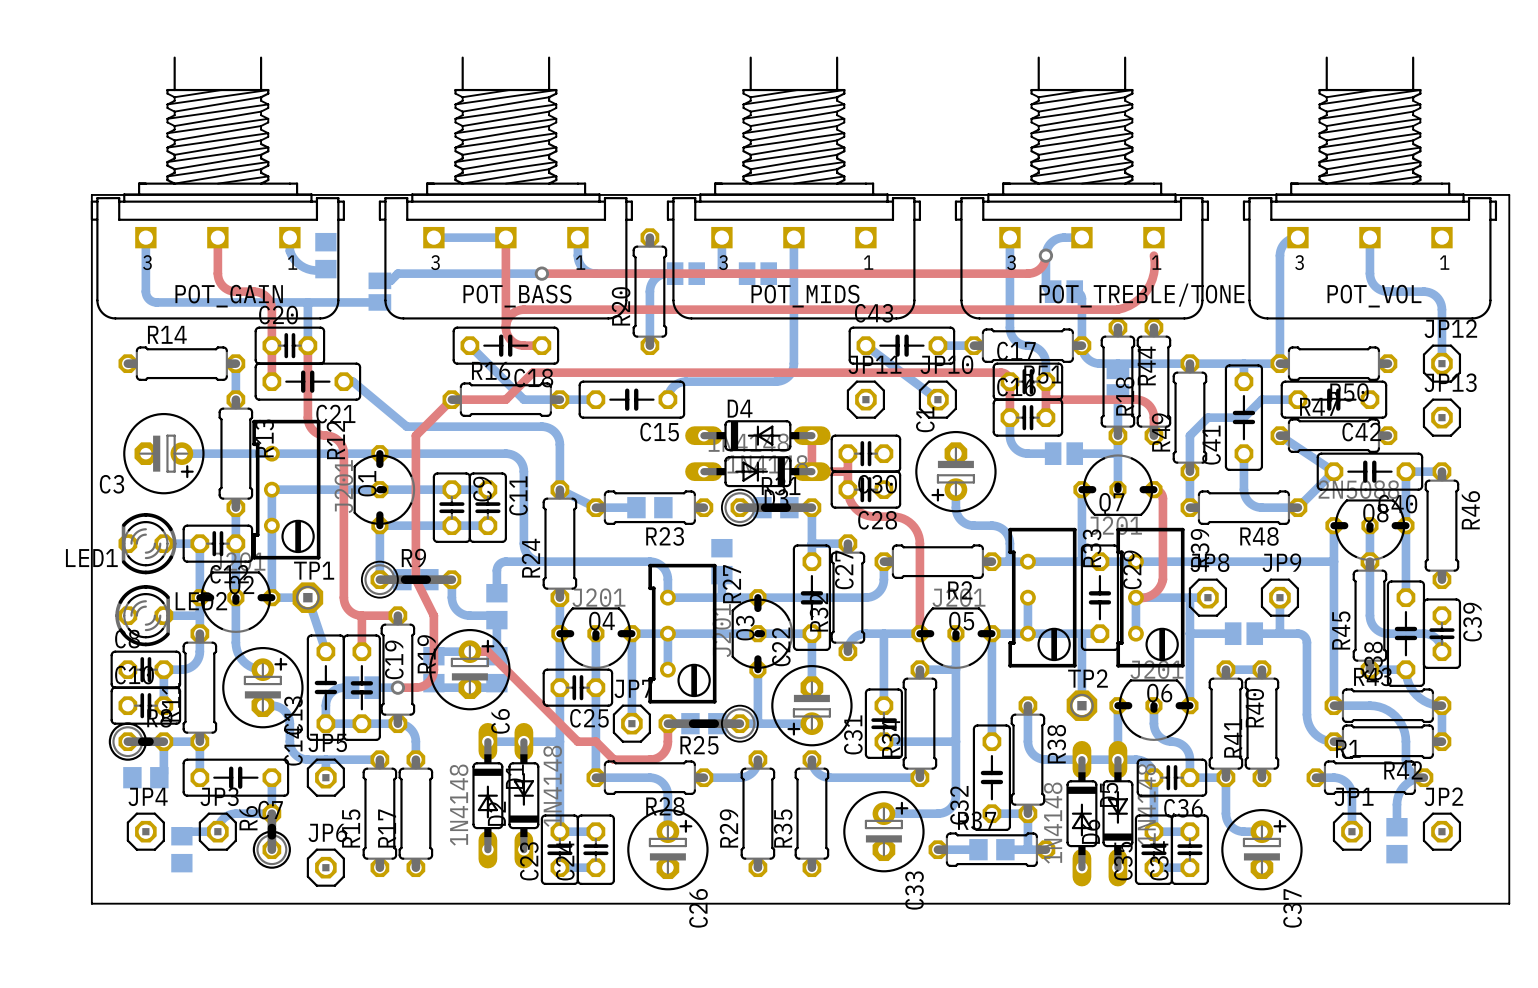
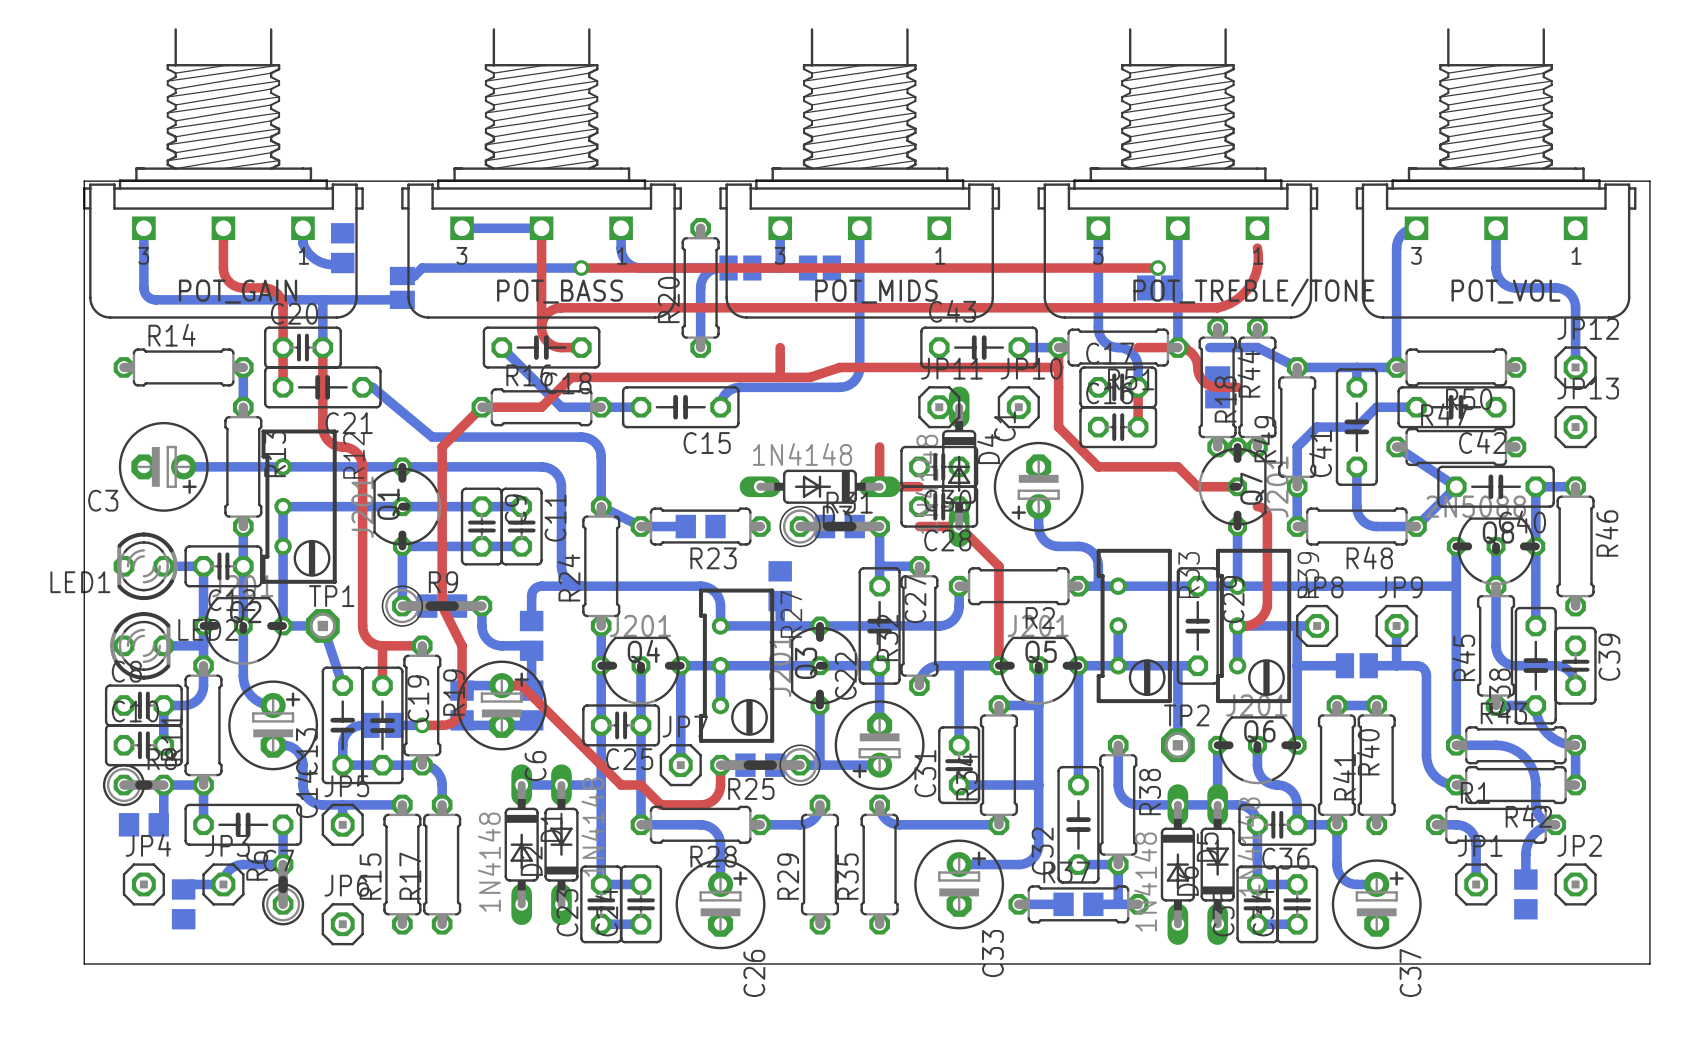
bottom track: (1081, 237) (1059, 238) (1048, 246) (1045, 255) (1045, 285) (1048, 289) (1053, 291) -> (1177, 228) (1177, 295)
top track: (1045, 255) (1040, 268) (1027, 273) -> (1158, 268) (1118, 268)
via position: (1045, 255) -> (1158, 268)
bottom track: (1081, 338) (1084, 354) (1095, 363) (1189, 363) -> (1209, 347) (1257, 347) (1297, 367)
top track: none -> (780, 347) (780, 377)
bottom track: (865, 345) (937, 399) -> none
top track: none -> (1058, 347) (1058, 427) (1098, 466) (1177, 466) (1197, 486) (1237, 486)
top track: none -> (1138, 347) (1185, 349) (1195, 357) (1199, 375) (1205, 383) (1215, 387) (1237, 387)
top track: (748, 372) (1002, 372) (1007, 375) (1009, 380) (1009, 417) -> (810, 377) (839, 367) (1058, 367)
bottom track: (1117, 392) (1117, 489) -> none
top track: (1045, 399) (1140, 400) (1146, 403) (1152, 410) (1153, 435) -> none
bottom track: (1009, 417) (1010, 440) (1016, 449) (1025, 453) (1053, 453) -> none
D4 rotation: 0° (757, 435) -> 90° clockwise (959, 466)
D4 position: (757, 435) -> (959, 466)
top track: (847, 453) (848, 493) (853, 506) (867, 515) (896, 516) (906, 520) (916, 530) (919, 543) -> (919, 526) (959, 526) (998, 566)
part: (1063, 453) -> none
bottom track: (1074, 453) (1117, 453) -> none
Q7 rotation: 0° (1117, 485) -> 90° counterclockwise (1232, 486)
bottom track: (1081, 489) (1081, 561) -> none
bottom track: none -> (1237, 526) (1237, 586)

